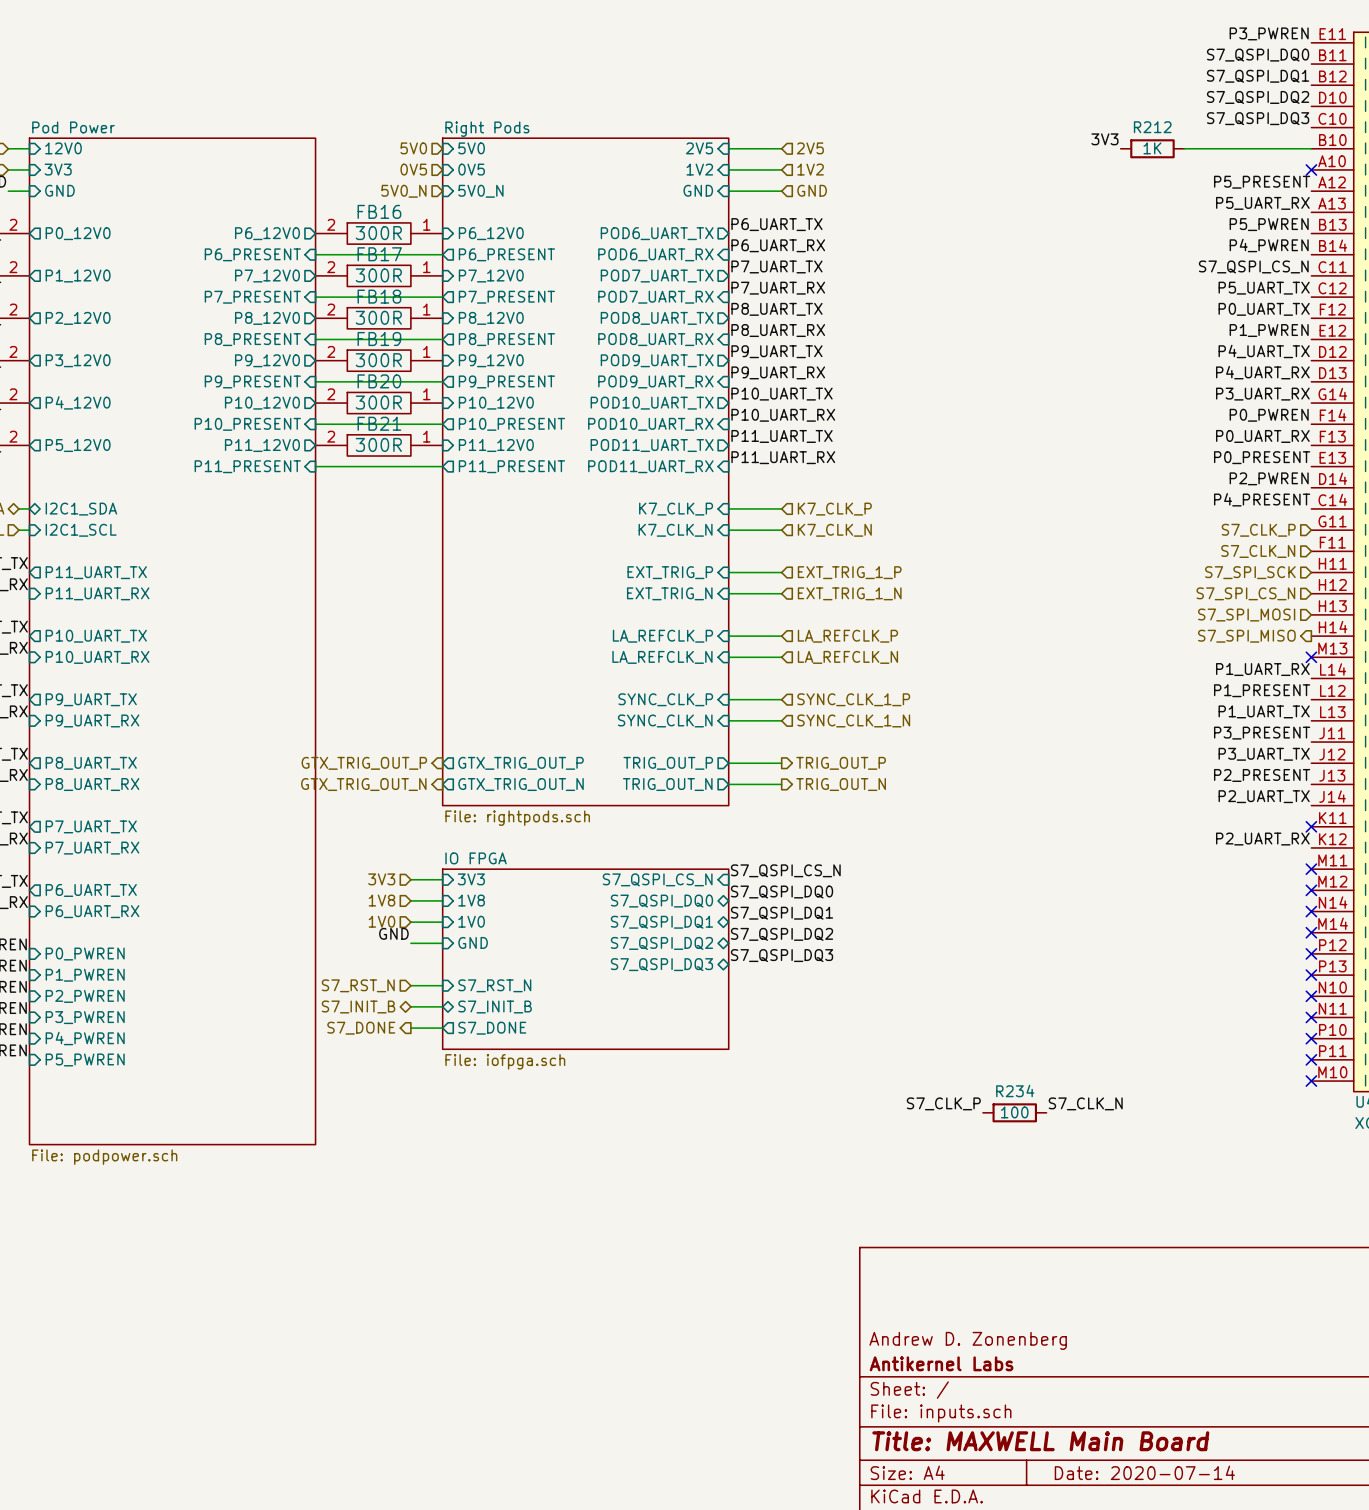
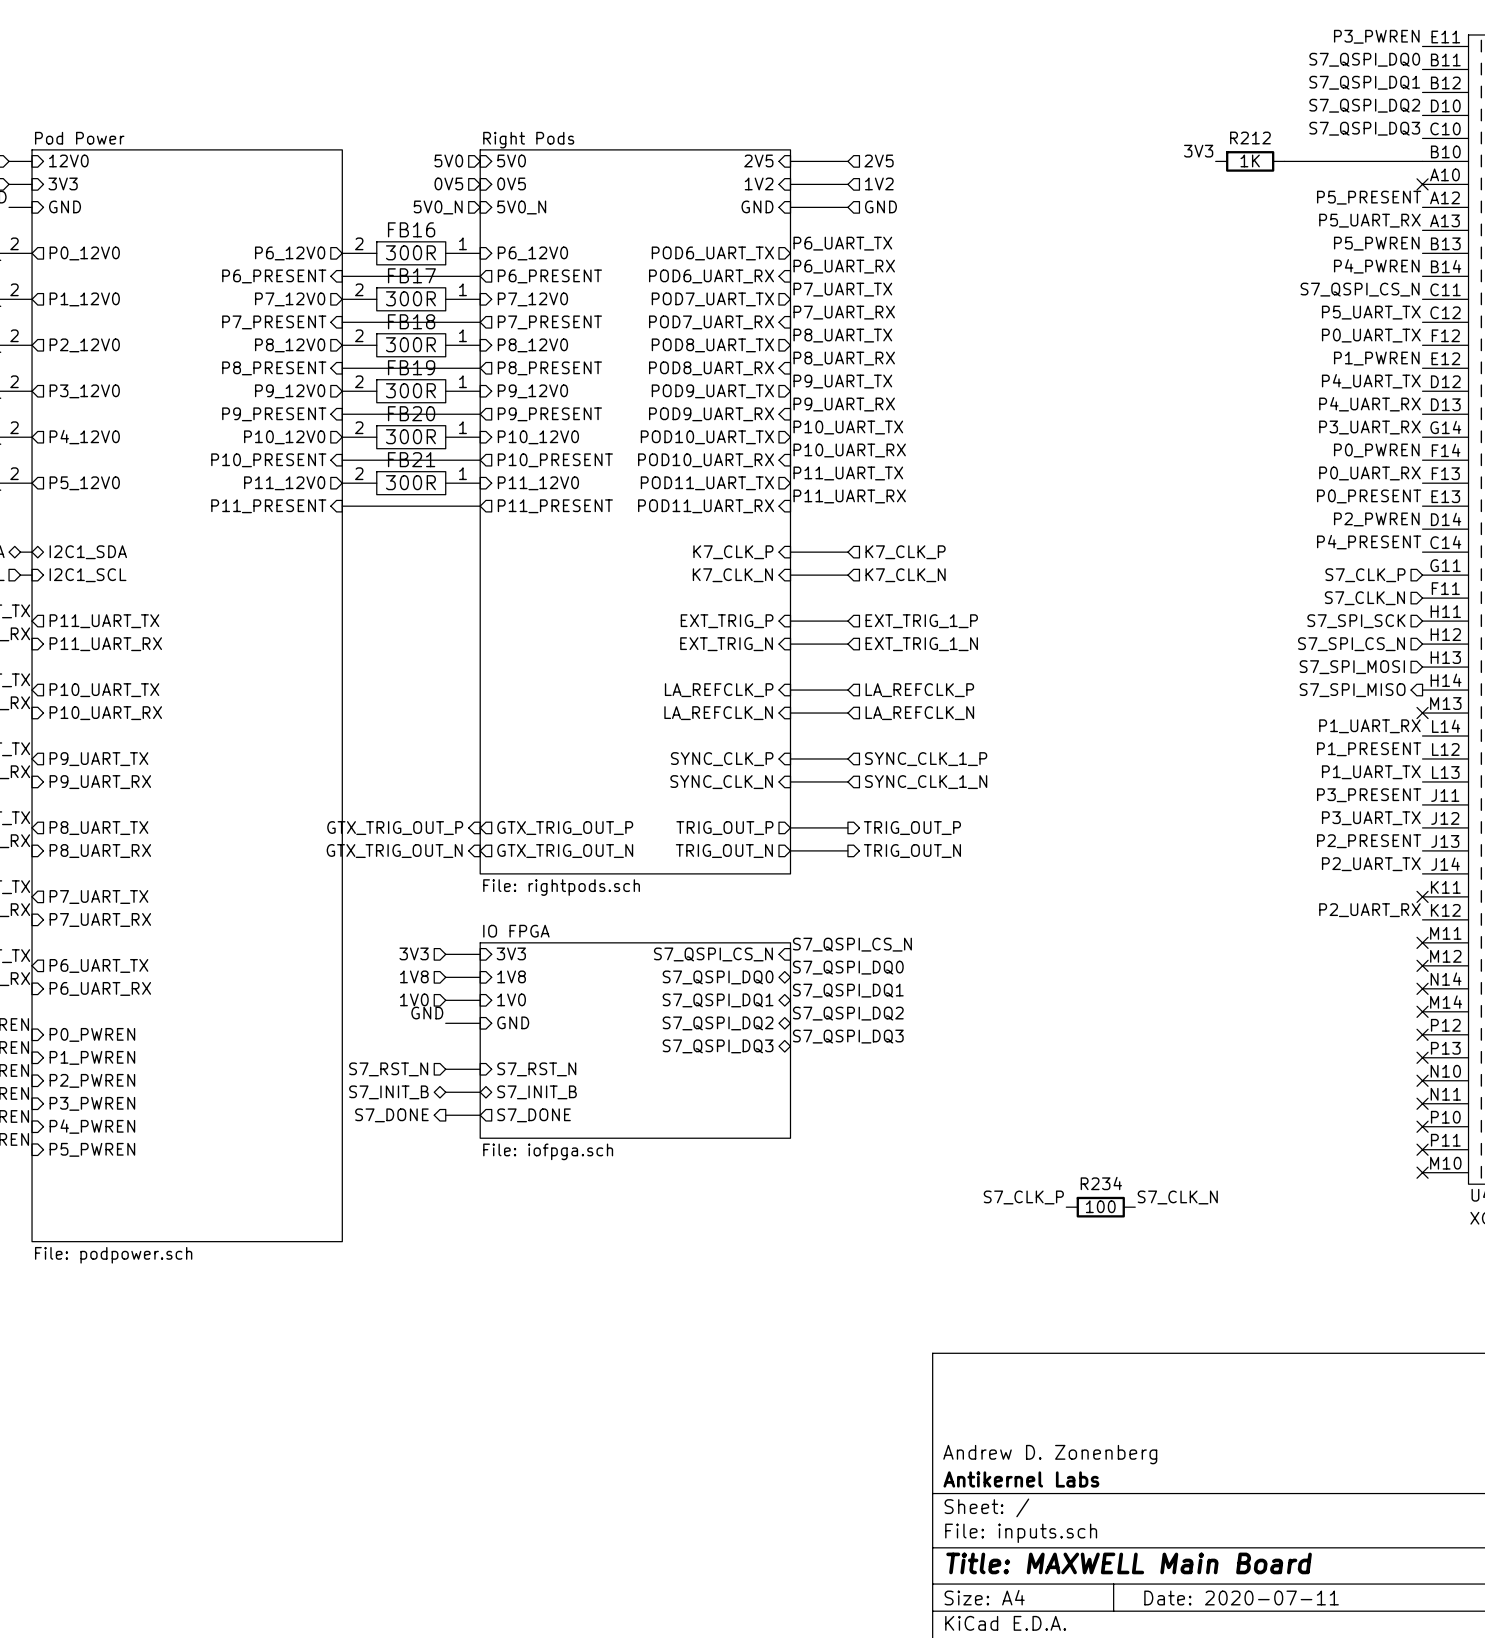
title block: Date: 2020-07-14 (1144, 1472) -> Date: 2020-07-11 (1241, 1598)

